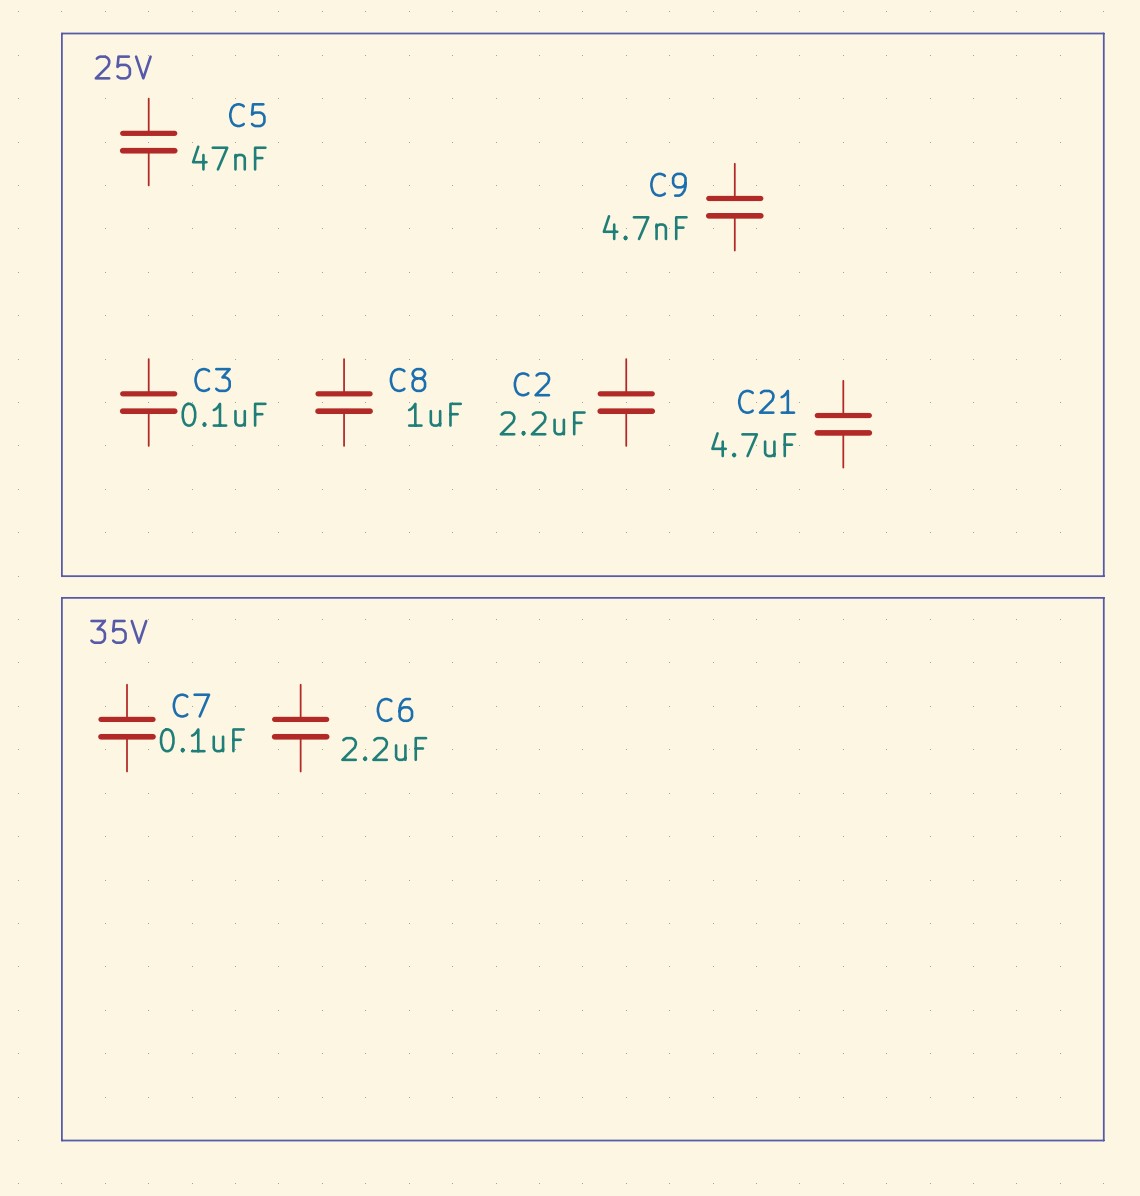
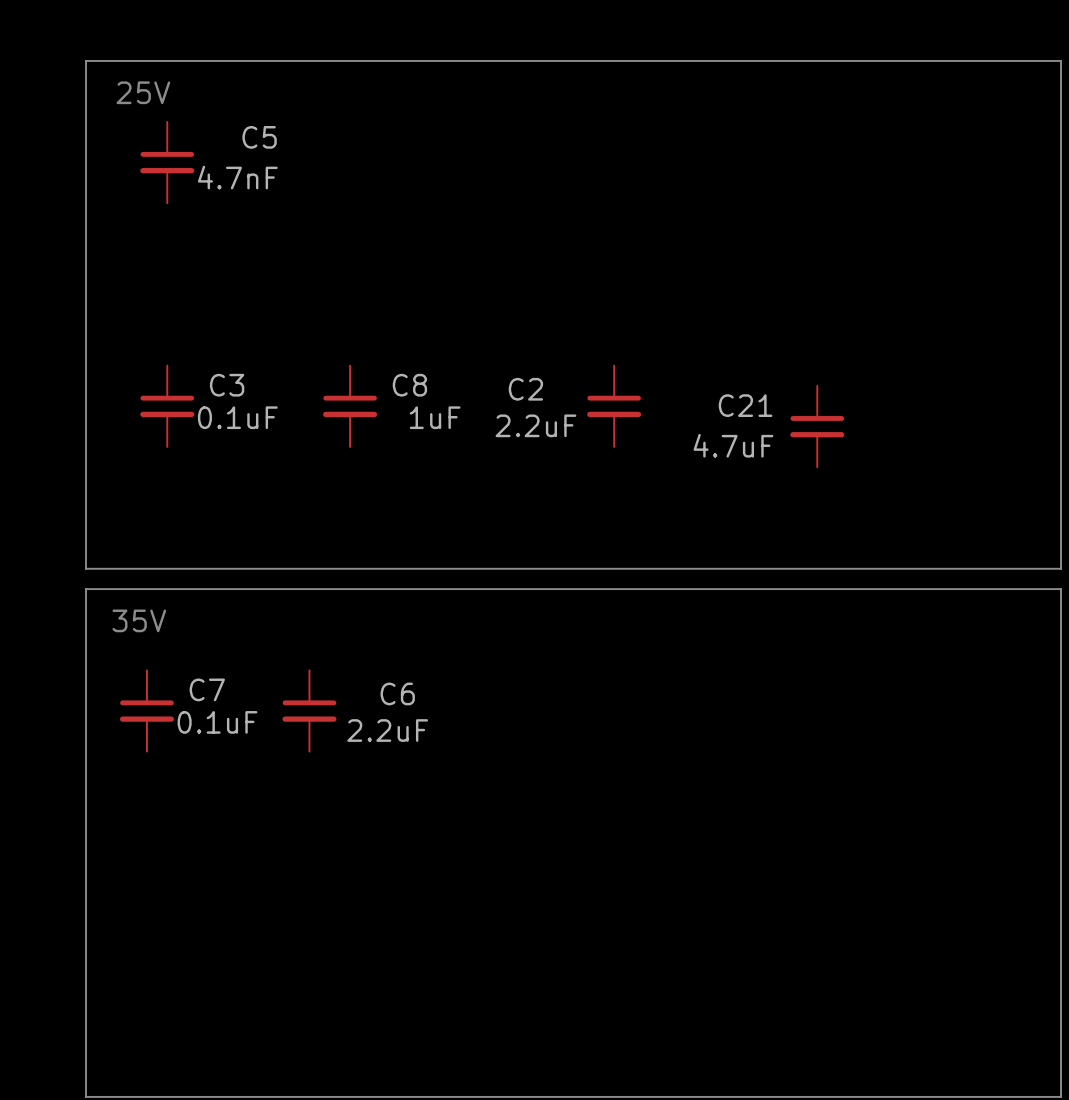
C5 value: 47nF (229, 158) -> 4.7nF (237, 177)
C9: 4.7nF (734, 207) -> none

